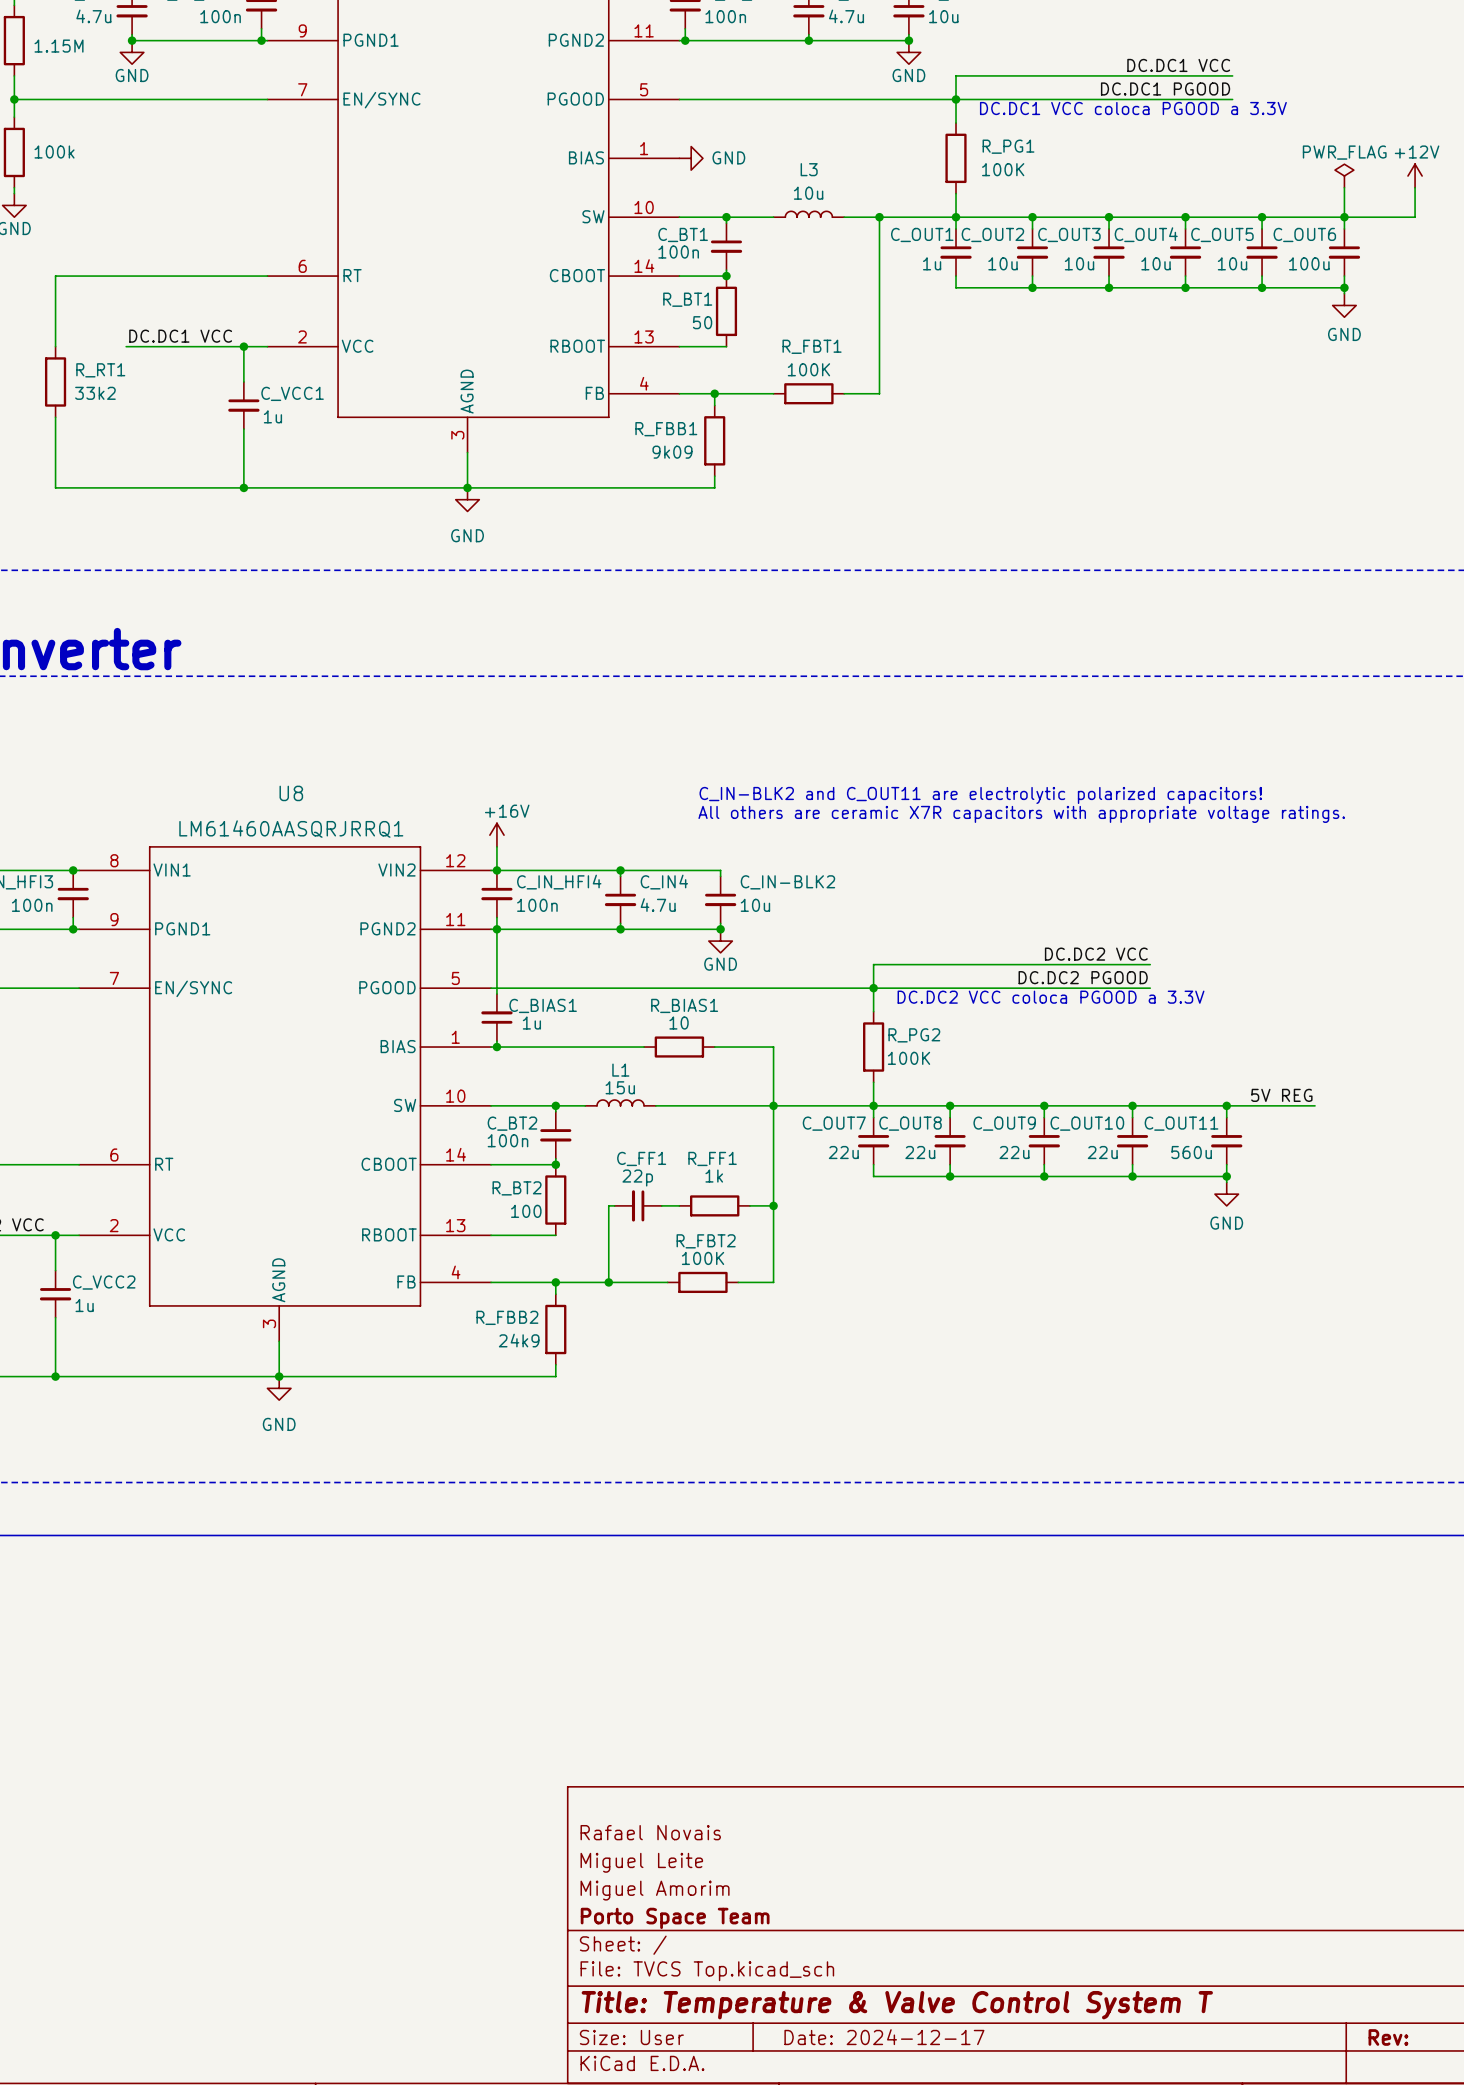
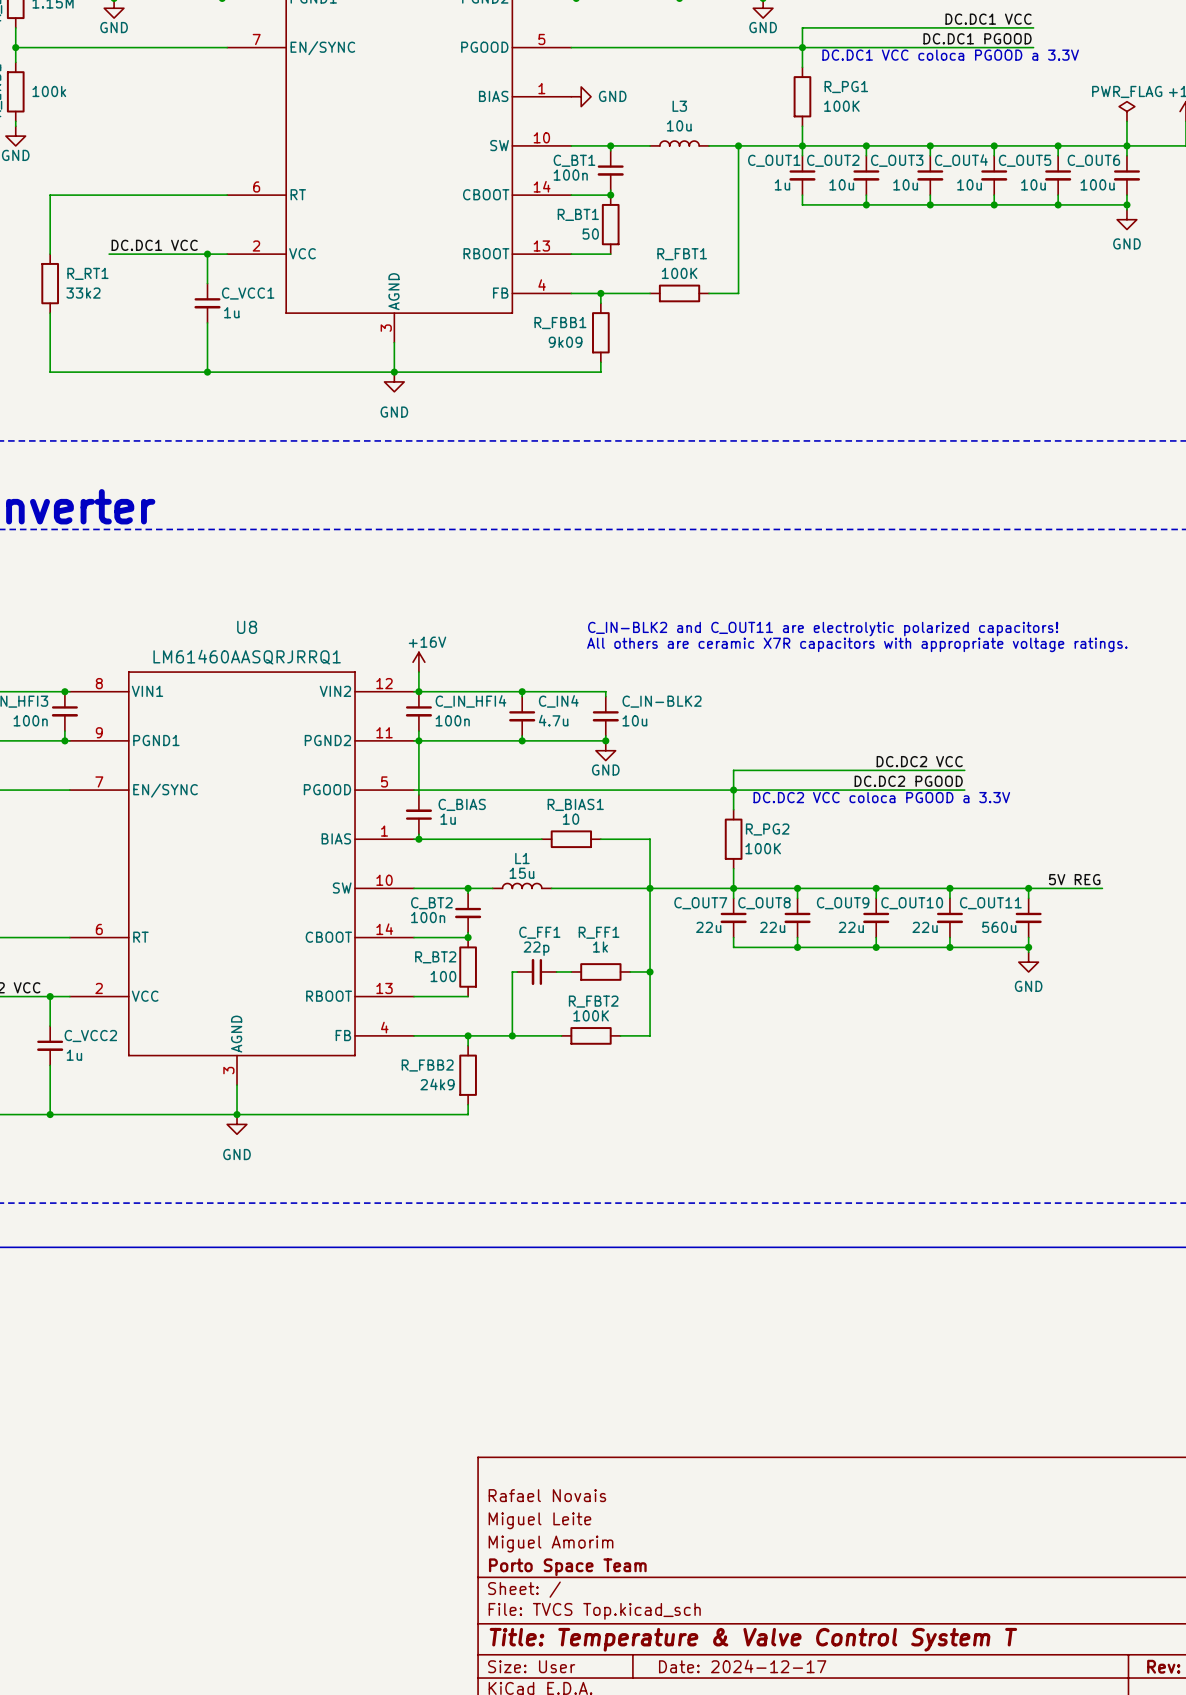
C_BIAS1 name: C_BIAS1 (543, 1005) -> C_BIAS (462, 804)

